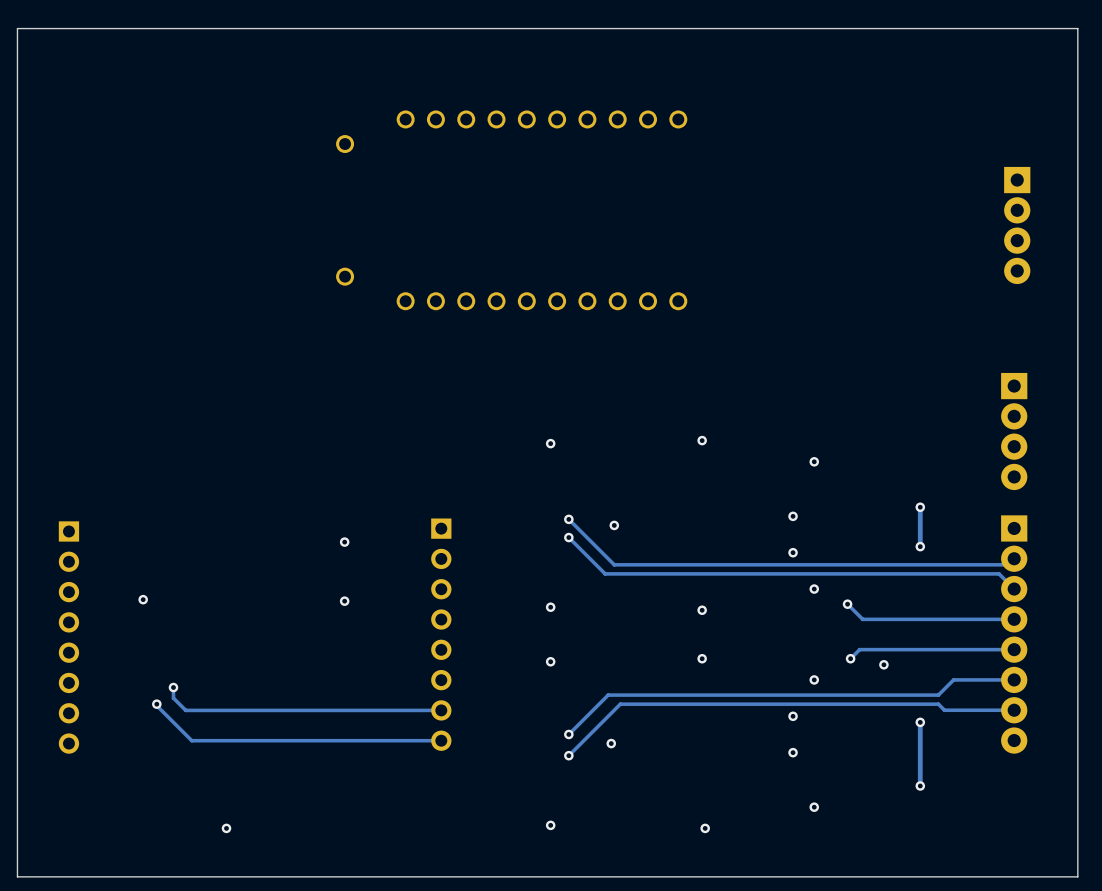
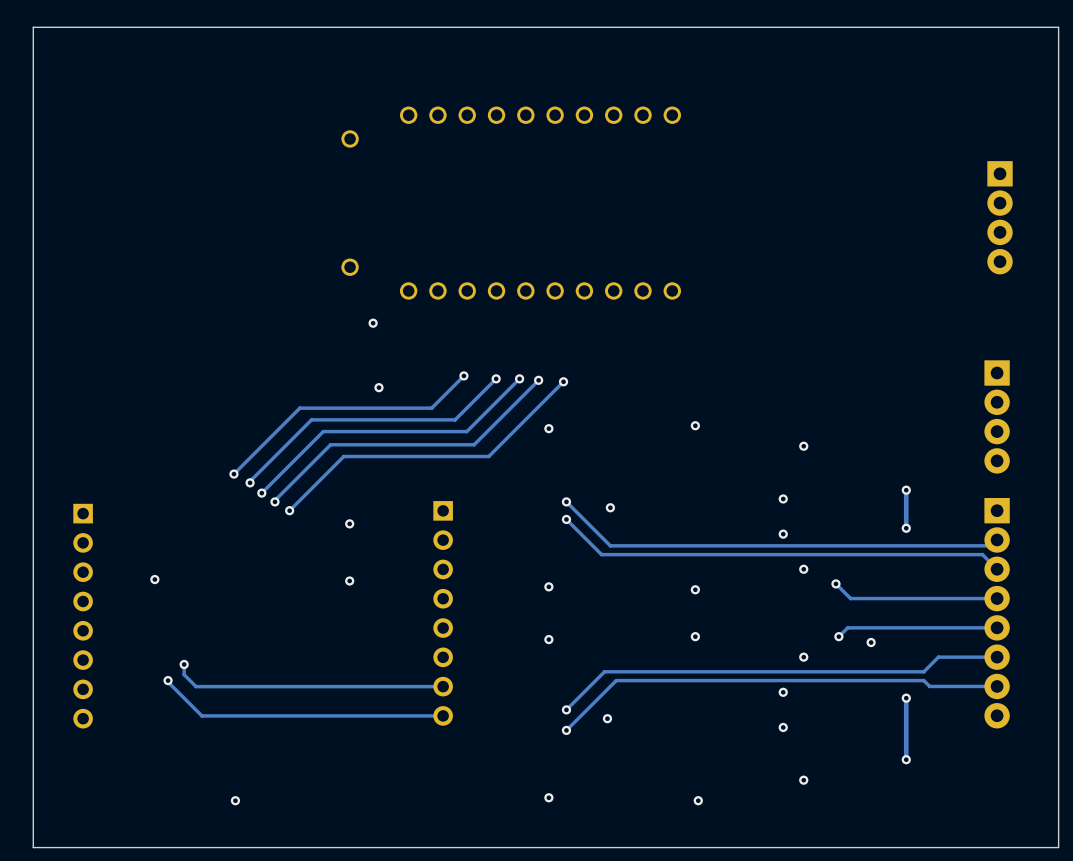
via: none -> (373, 323)
track: none -> (463, 375) (431, 408) (299, 408) (233, 474)
via: none -> (463, 375)
track: none -> (496, 378) (455, 419) (311, 419) (250, 482)
via: none -> (496, 378)
track: none -> (519, 378) (466, 431) (323, 431) (261, 493)
via: none -> (519, 378)
track: none -> (538, 380) (474, 444) (330, 444) (274, 501)
via: none -> (538, 380)
track: none -> (563, 381) (488, 456) (343, 456) (289, 510)
via: none -> (563, 381)
via: none -> (378, 387)
via: none -> (233, 474)
via: none -> (250, 482)
via: none -> (261, 493)
via: none -> (274, 501)
via: none -> (289, 510)

